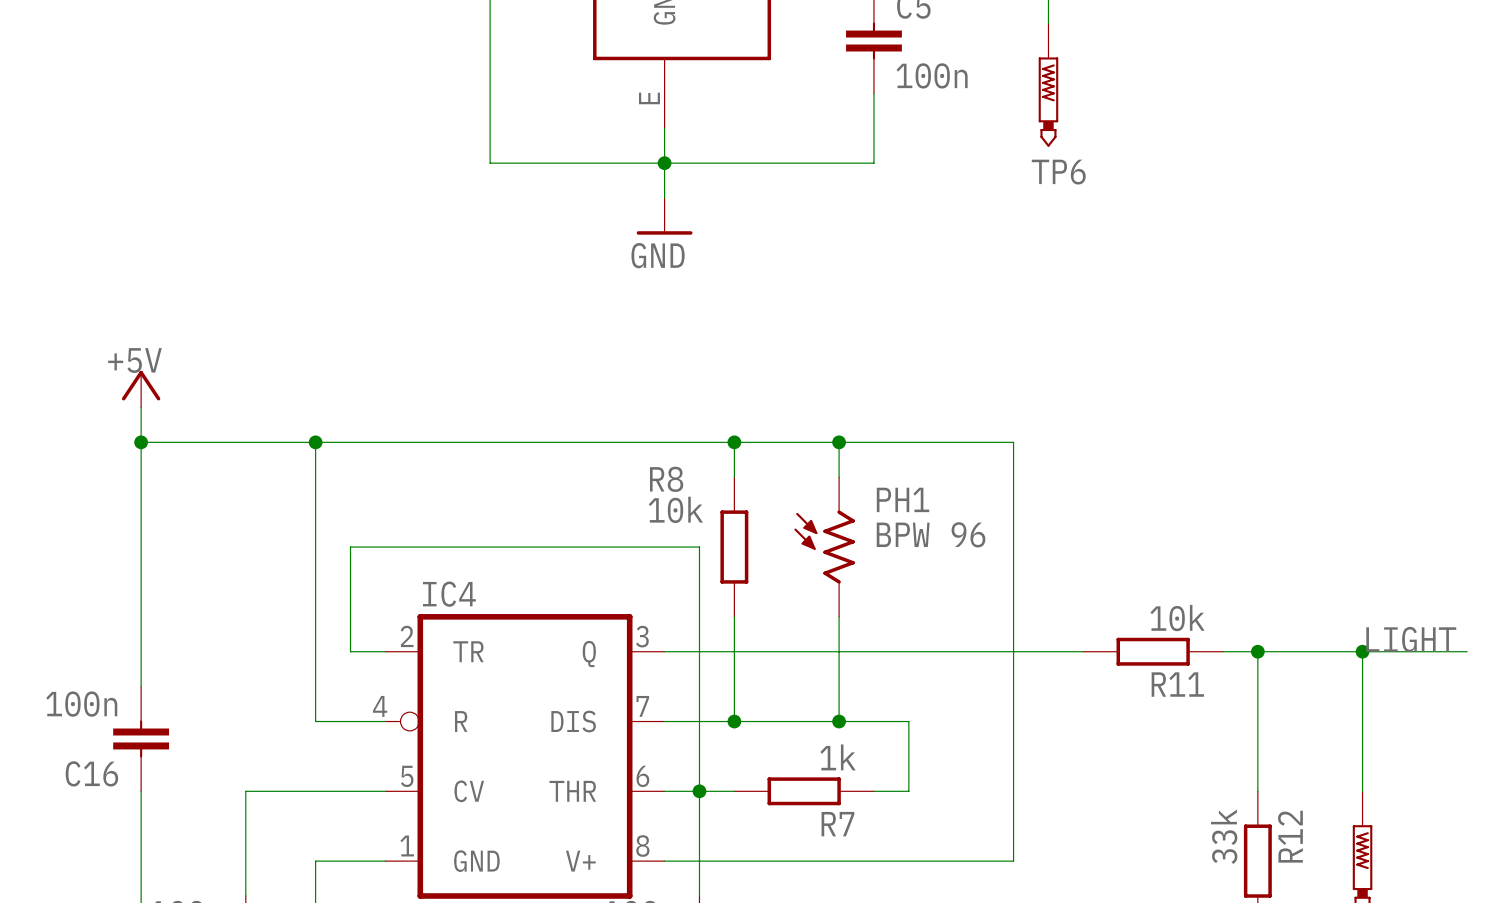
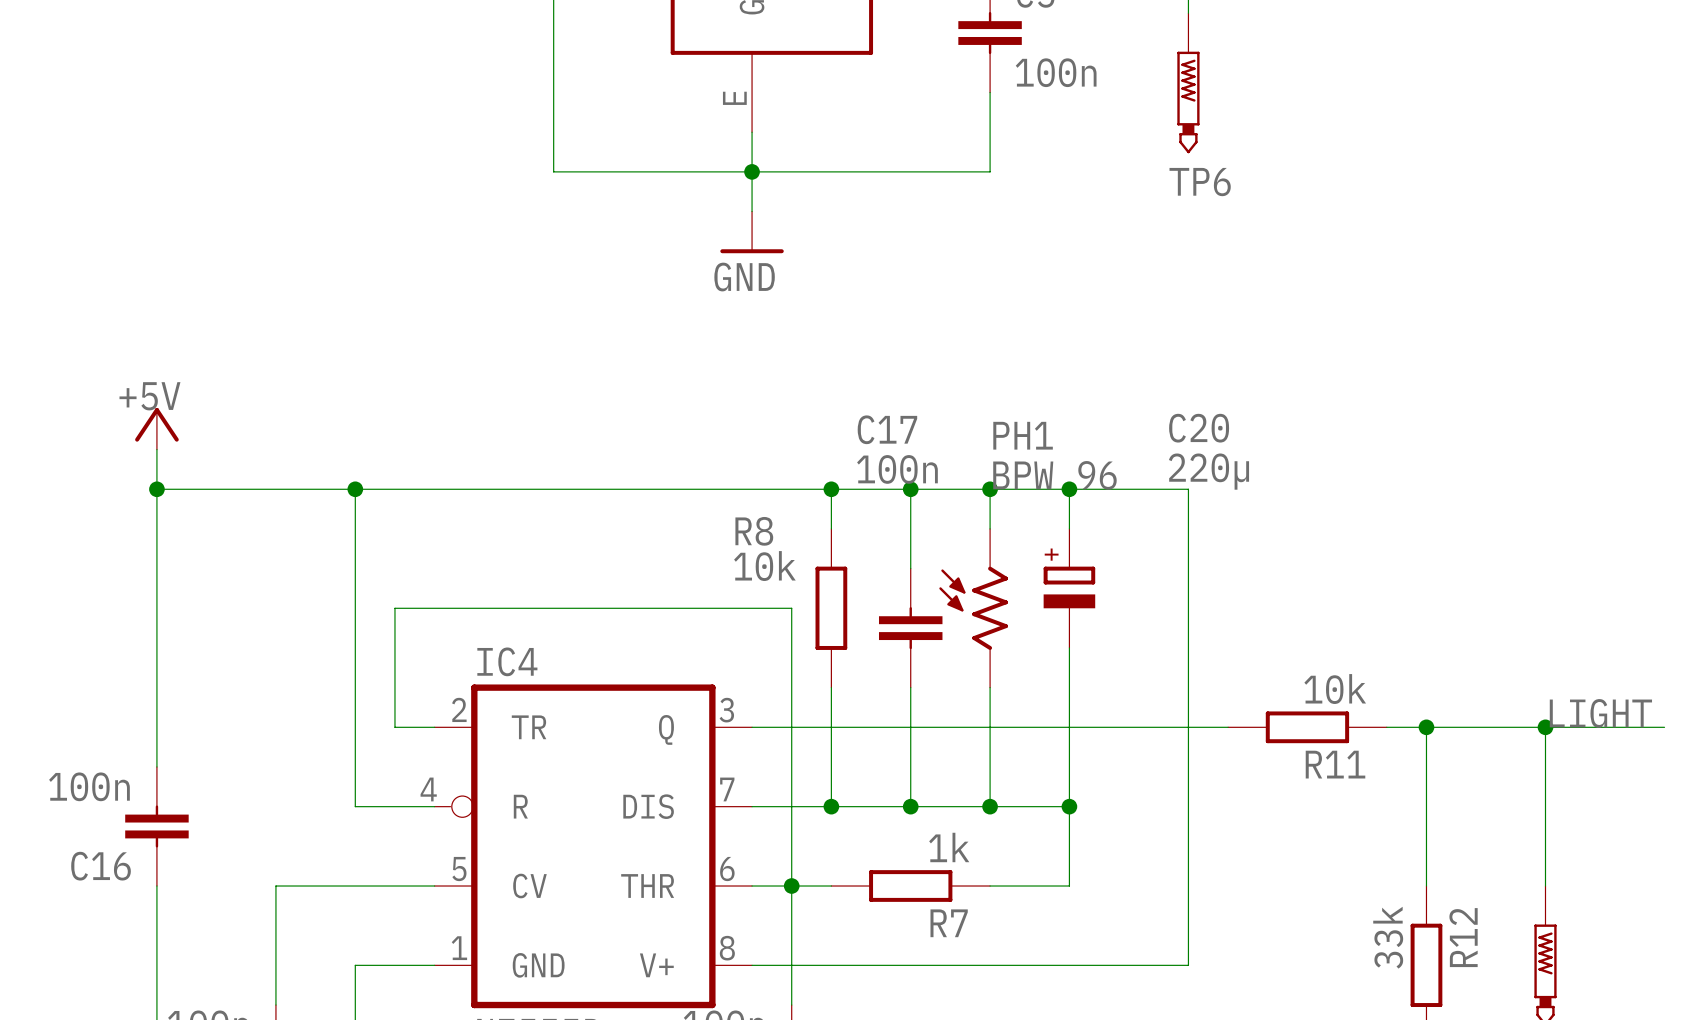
wire: none -> (910, 489) (910, 568)
junction: none -> (910, 489)
wire: (839, 442) (839, 477) -> (990, 489) (990, 528)
junction: (839, 442) -> none
junction: none -> (990, 489)
wire: none -> (1069, 489) (1069, 528)
junction: none -> (1069, 489)
wire: (1013, 442) (1013, 861) -> (1148, 489) (1188, 489) (1188, 965) (1148, 965)
PH1 name position: PH1 (903, 499) -> PH1 (1023, 435)
C20: none -> 220µ (1069, 588)
PH1 value position: BPW 96 (931, 534) -> BPW 96 (1054, 475)
PH1 position: (824, 547) -> (973, 608)
C17: none -> 100n (910, 628)
wire: none -> (1069, 647) (1069, 886) (1029, 886)
wire: none -> (910, 687) (910, 806)
wire: (839, 616) (839, 721) -> (990, 687) (990, 806)
junction: none -> (910, 806)
junction: (839, 721) -> none
junction: none -> (990, 806)
wire: (908, 721) (908, 791) -> (1029, 806) (1069, 806)
junction: none -> (1069, 806)

